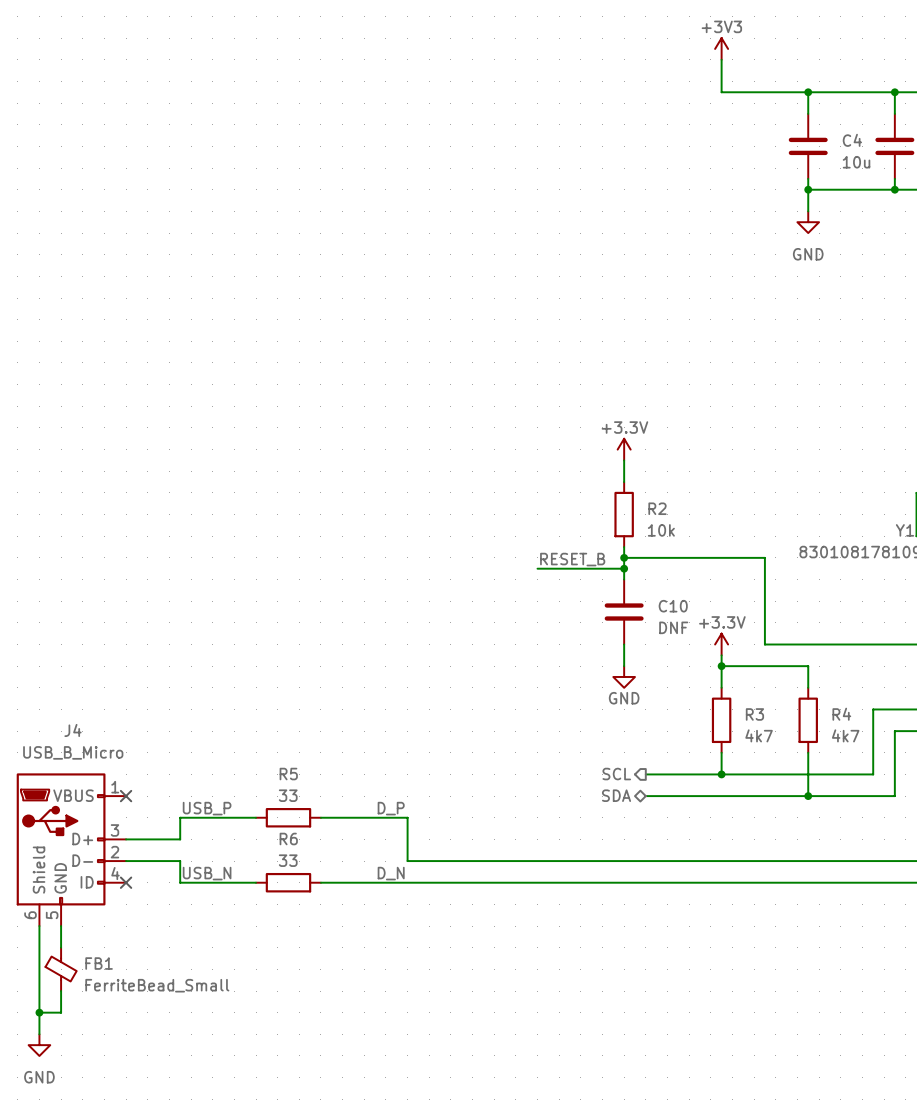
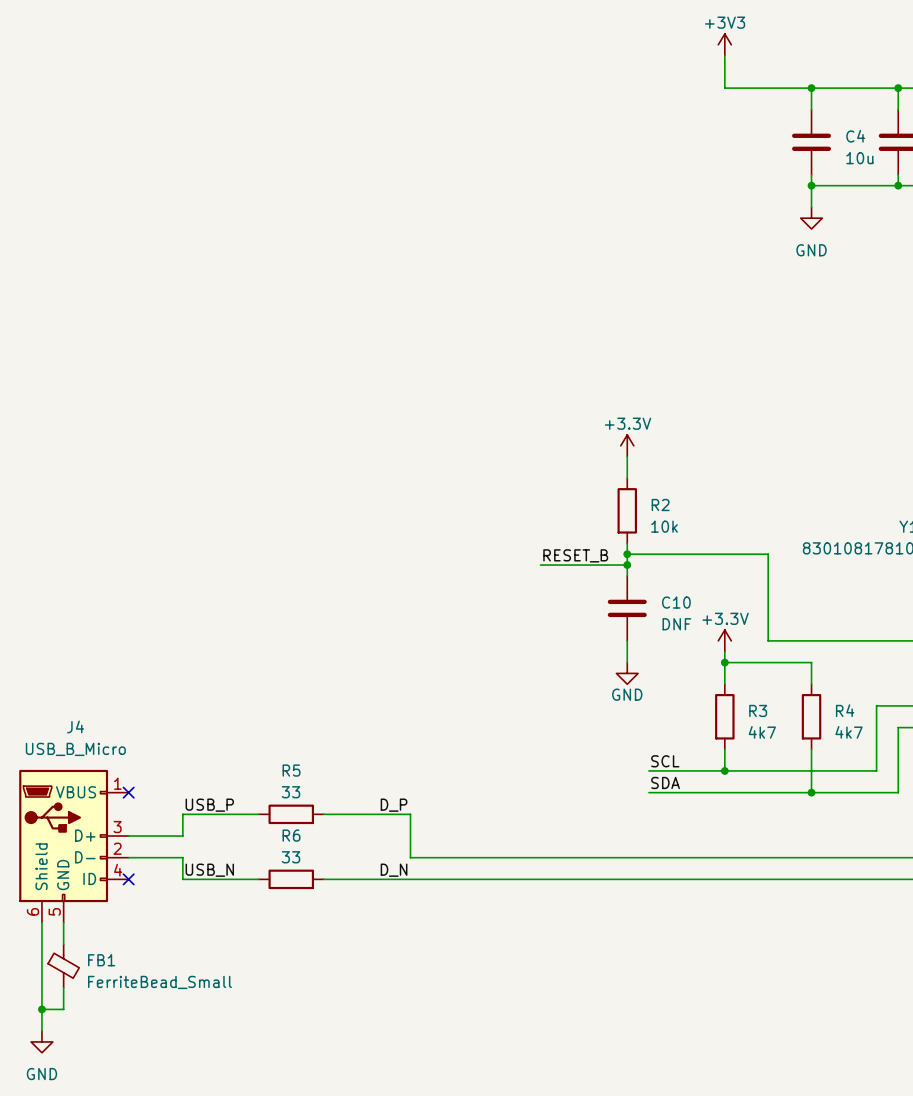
label: none -> SCL (665, 761)
hierarchical label: SCL (616, 774) -> none
label: none -> SDA (665, 782)
hierarchical label: SDA (616, 795) -> none

